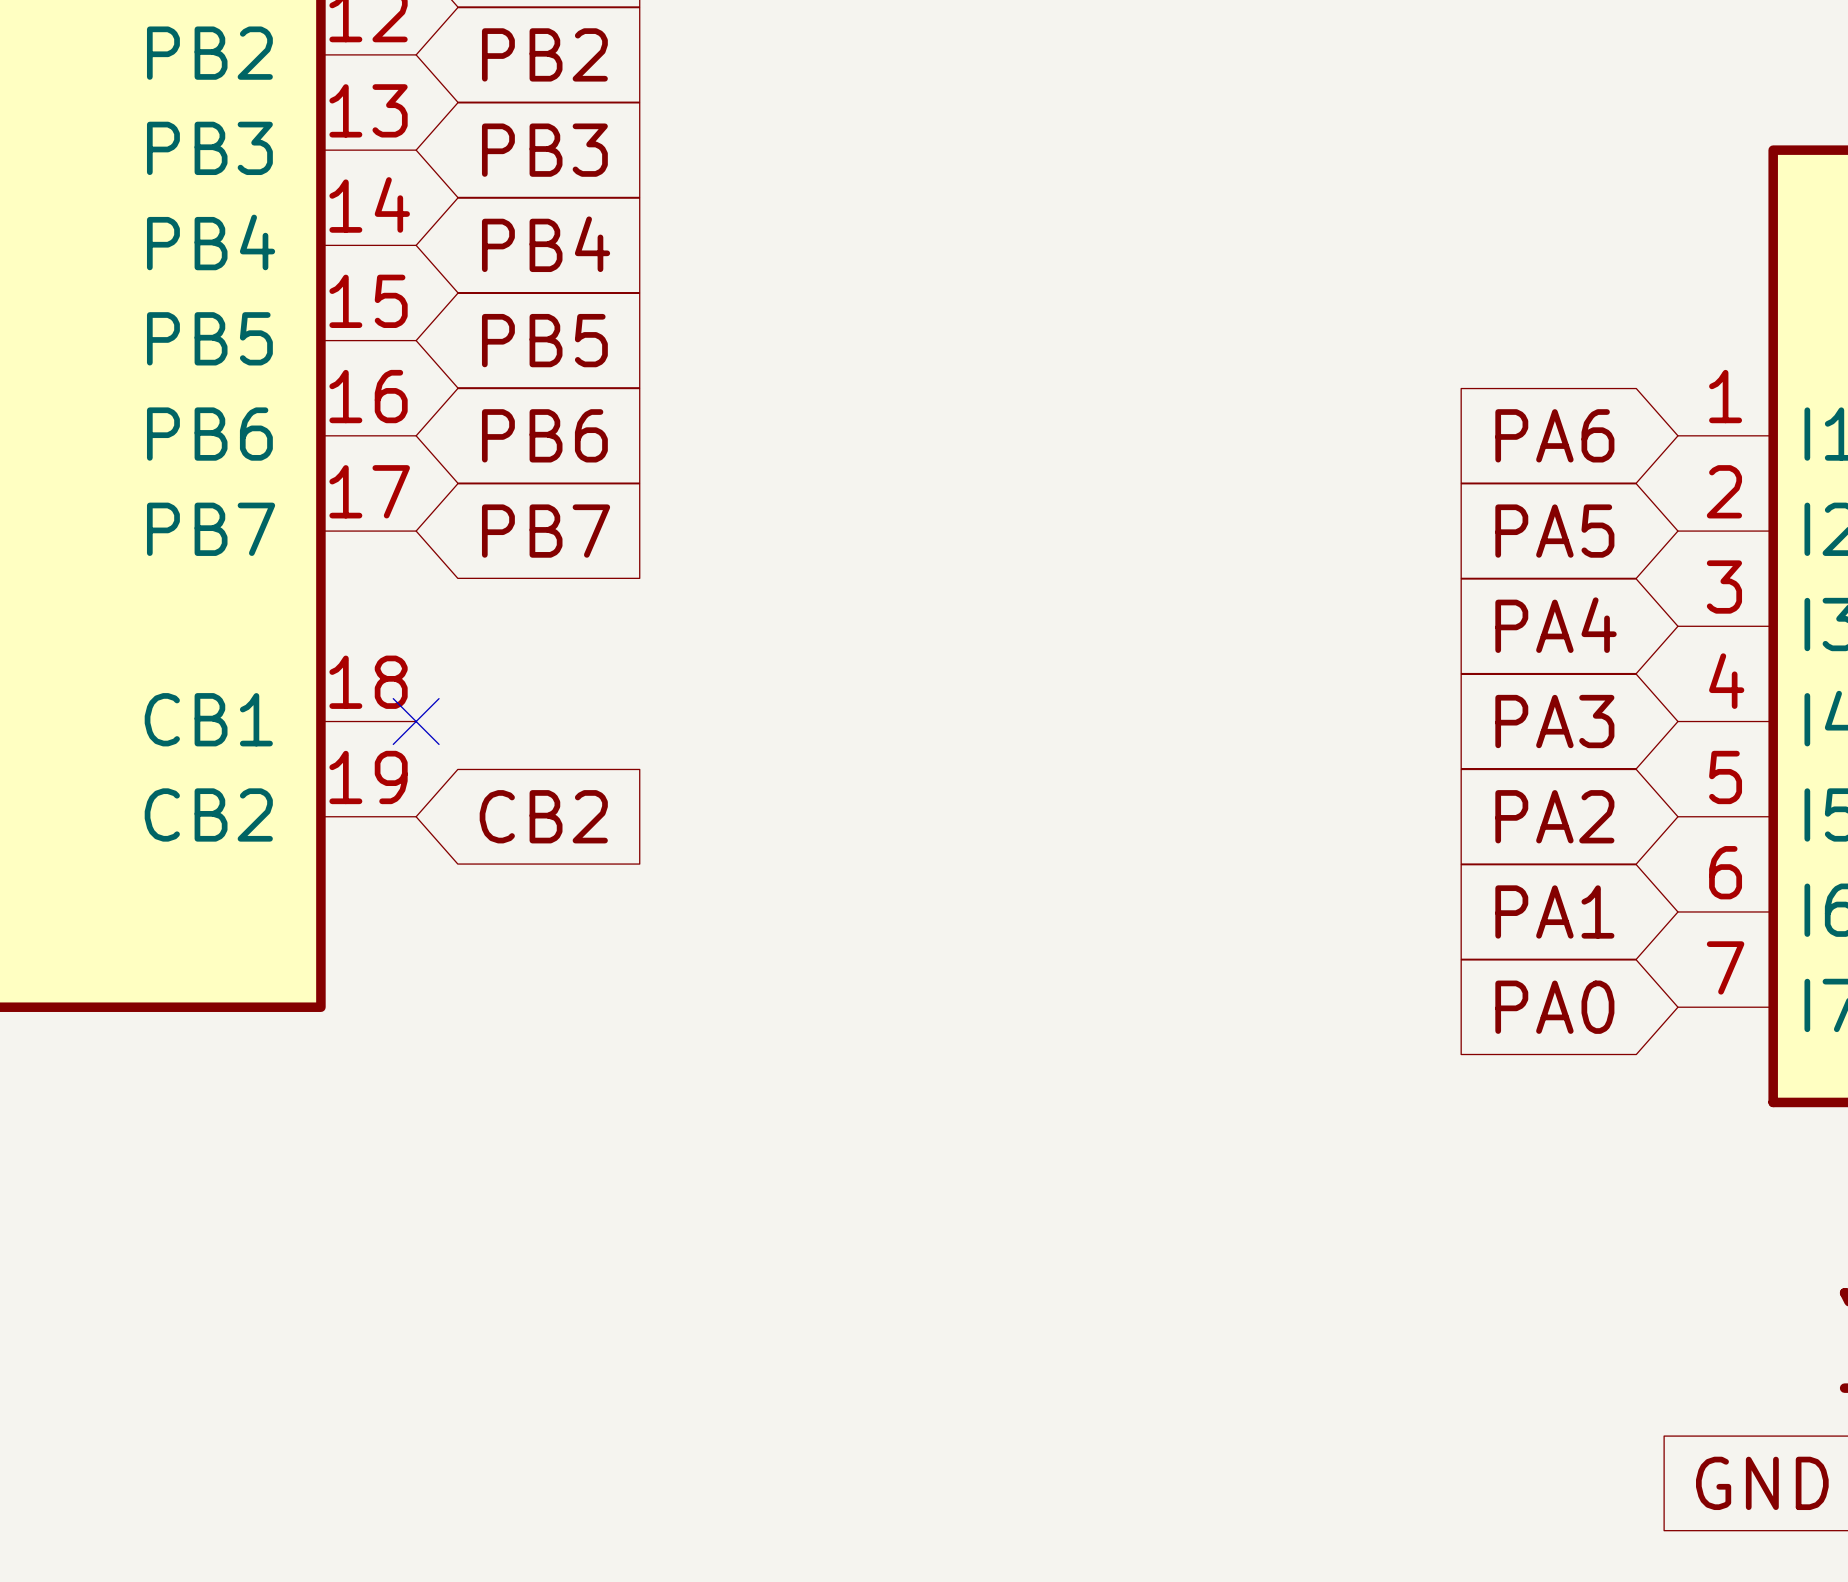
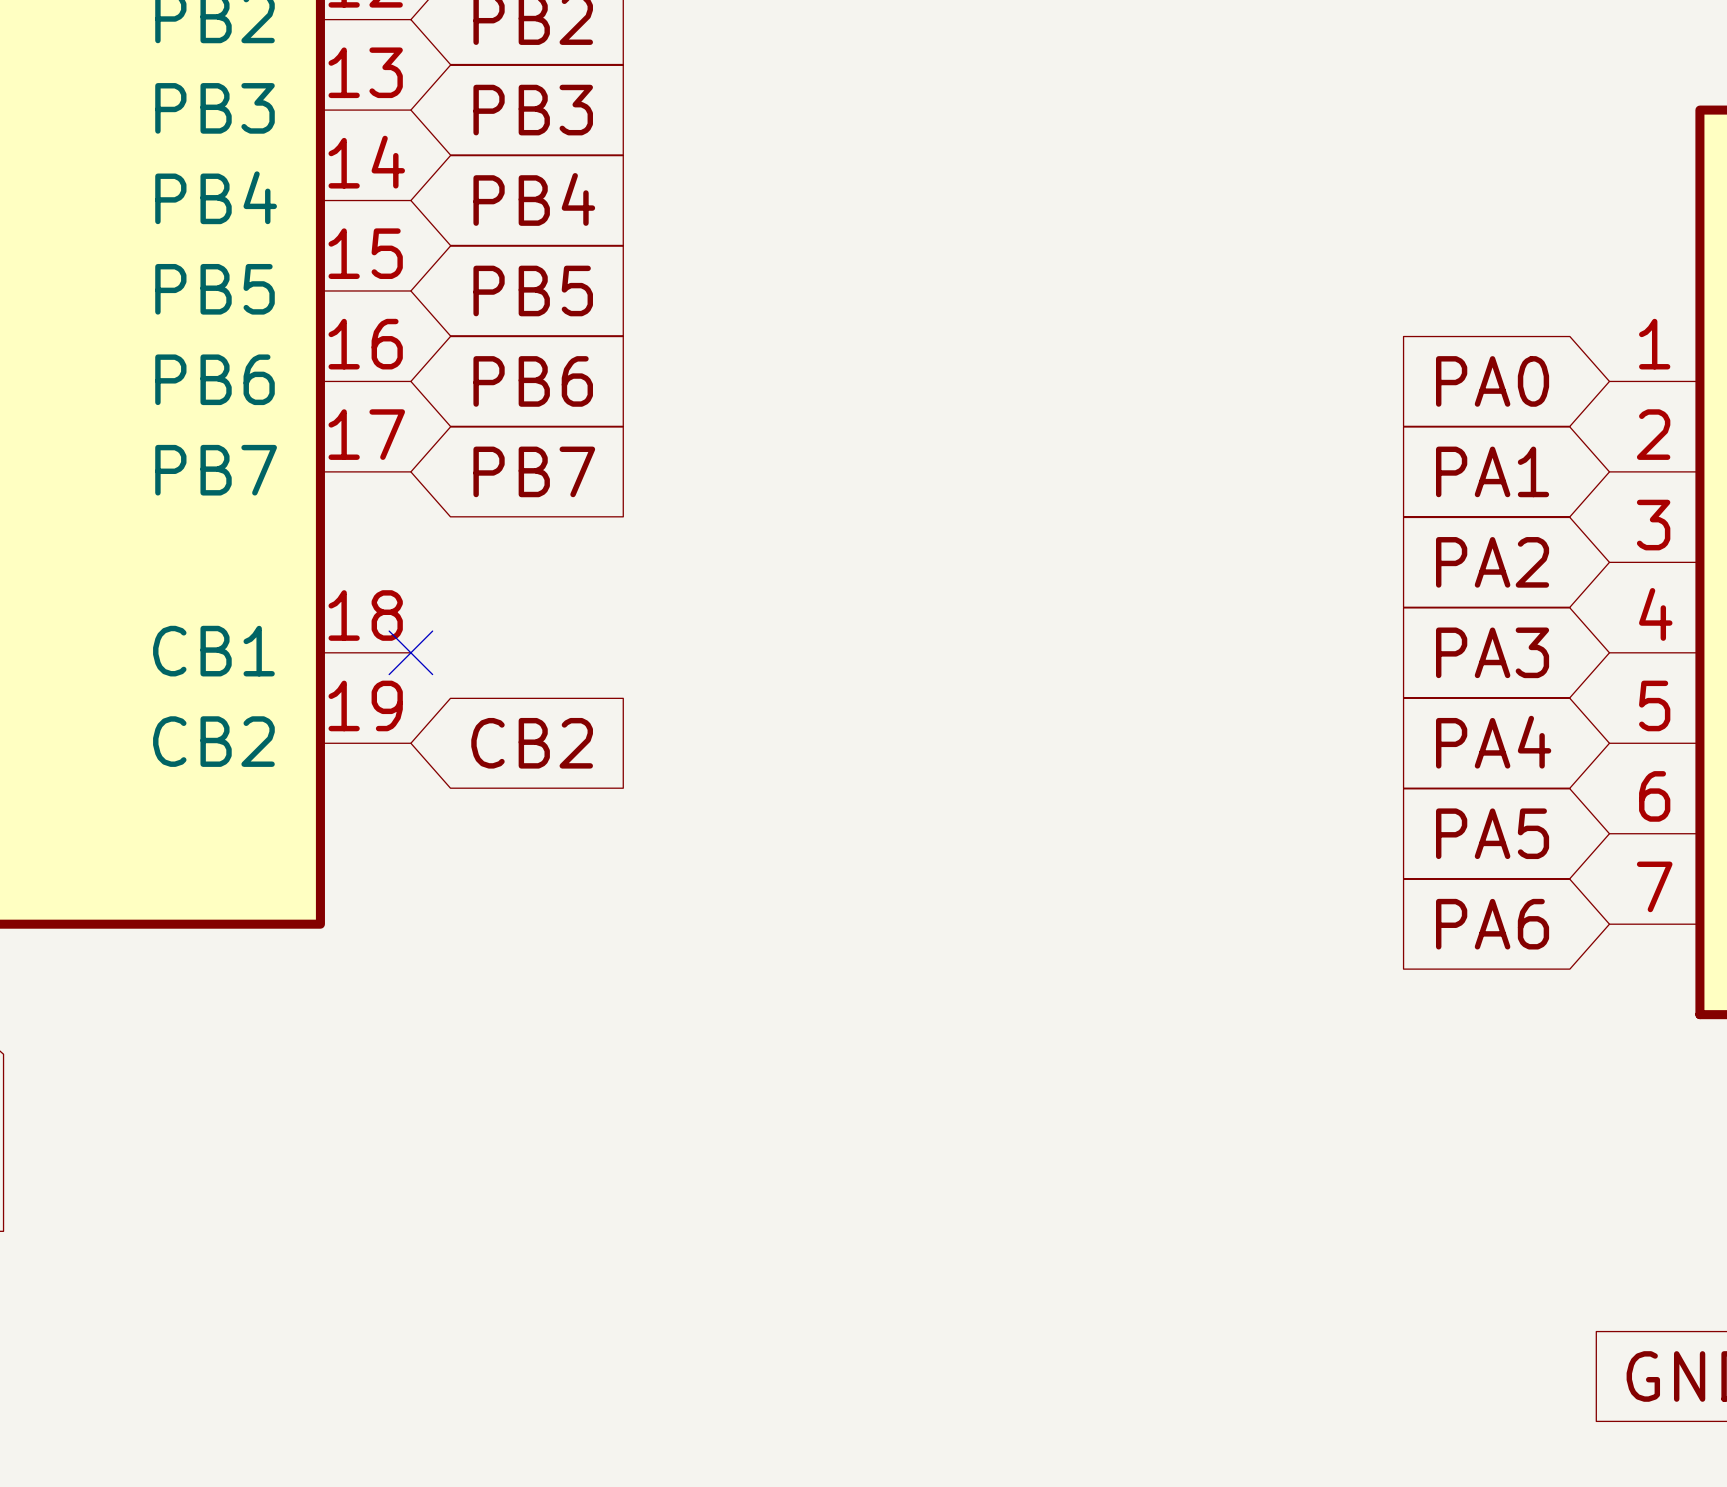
global label: PA6 (1554, 435) -> PA0 (1492, 381)
global label: PA5 (1554, 531) -> PA1 (1492, 471)
global label: PA4 (1556, 625) -> PA2 (1492, 562)
global label: PA2 (1554, 816) -> PA4 (1493, 742)
global label: PA1 (1554, 911) -> PA5 (1492, 833)
global label: PA0 (1554, 1007) -> PA6 (1492, 924)

